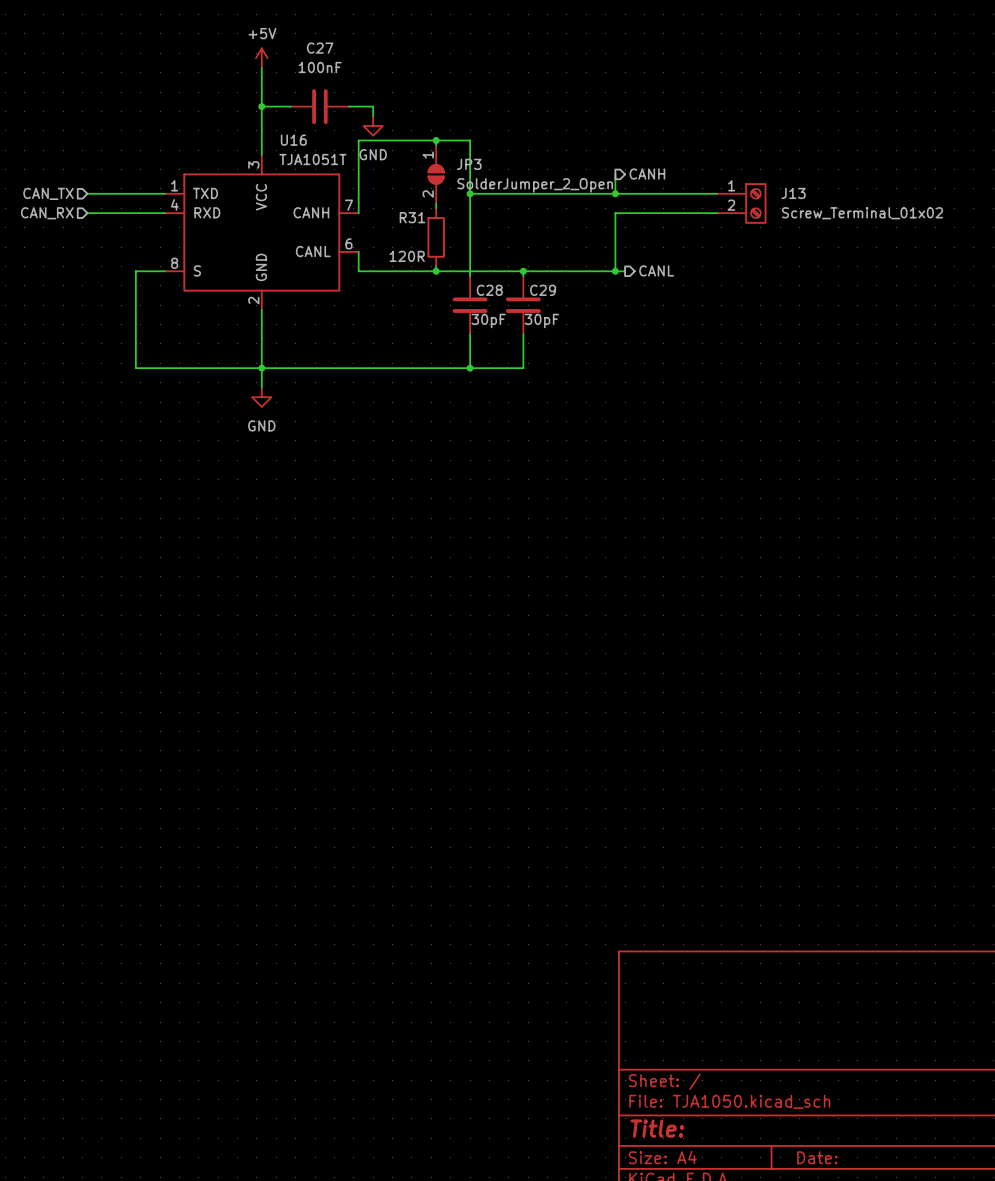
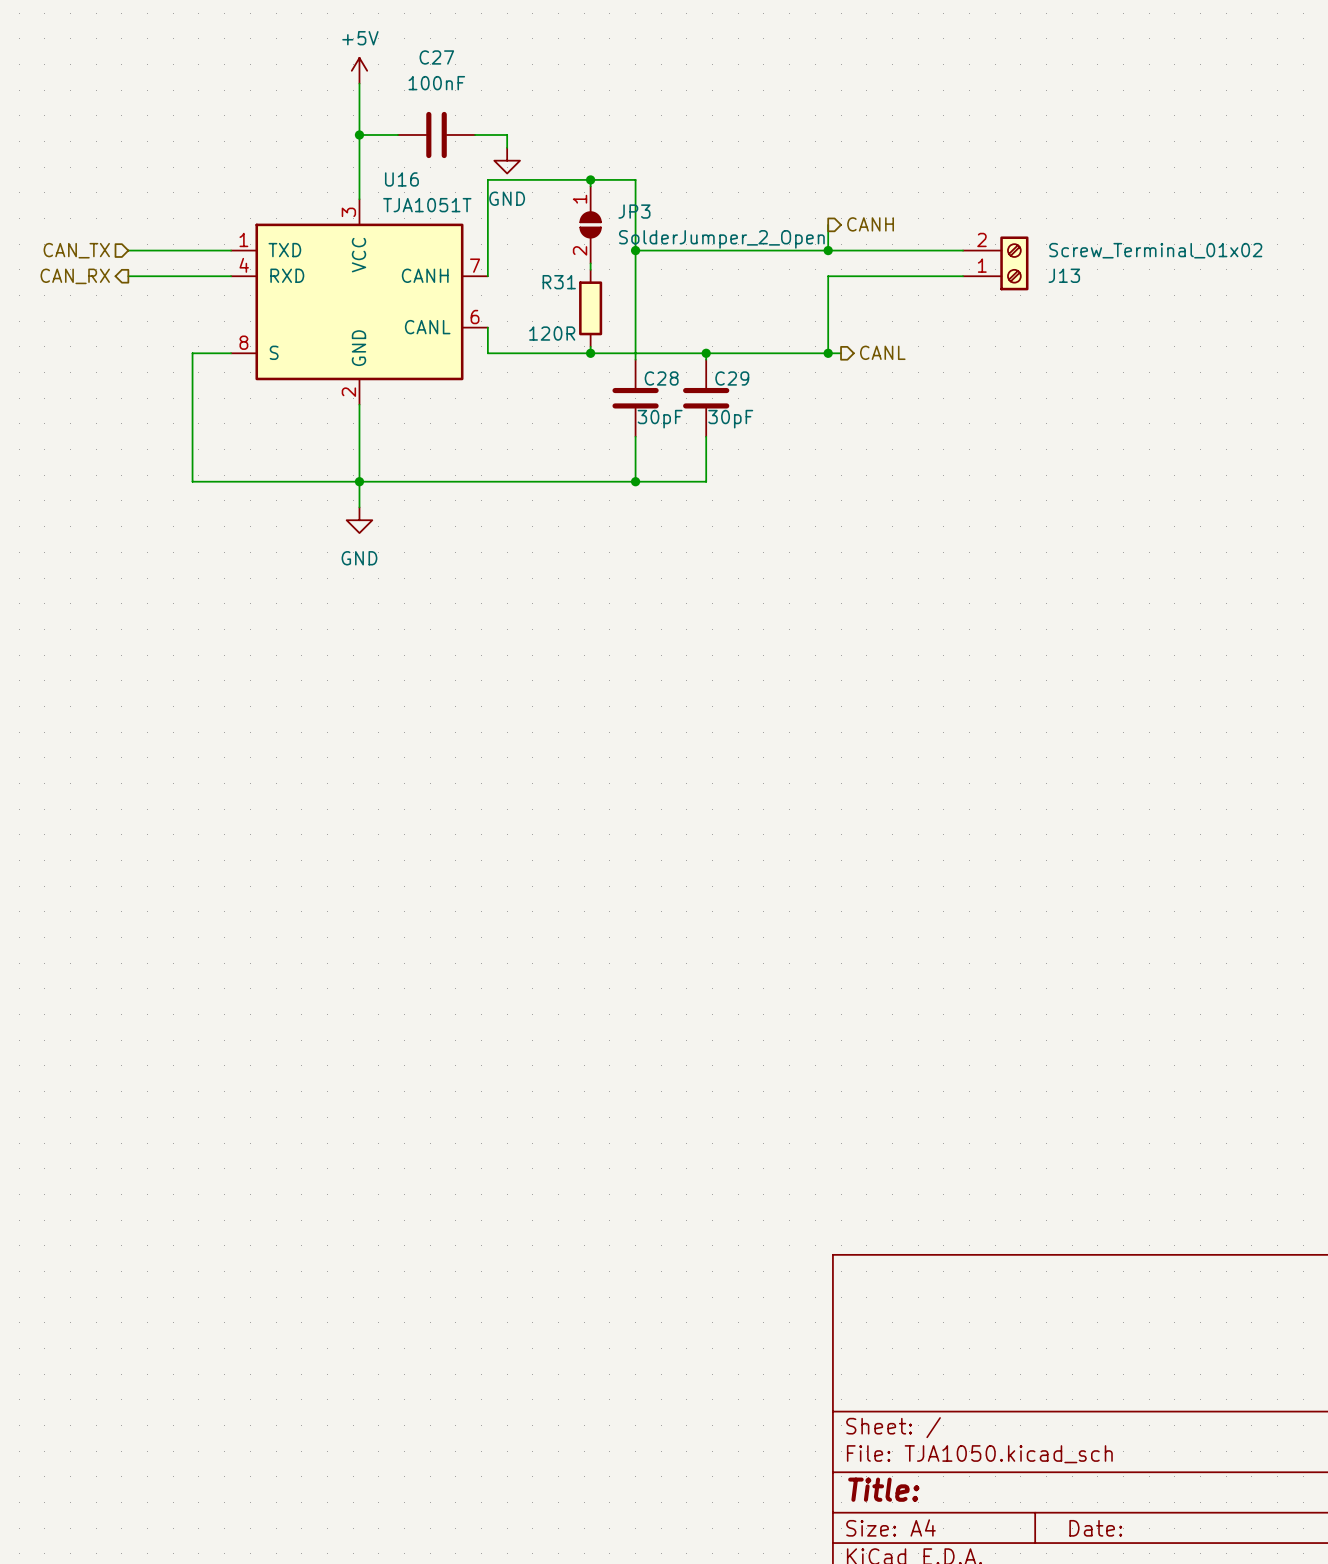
J13 flip: as is (755, 203) -> up-down (1014, 263)
hierarchical label shape: input (47, 213) -> output (75, 276)

